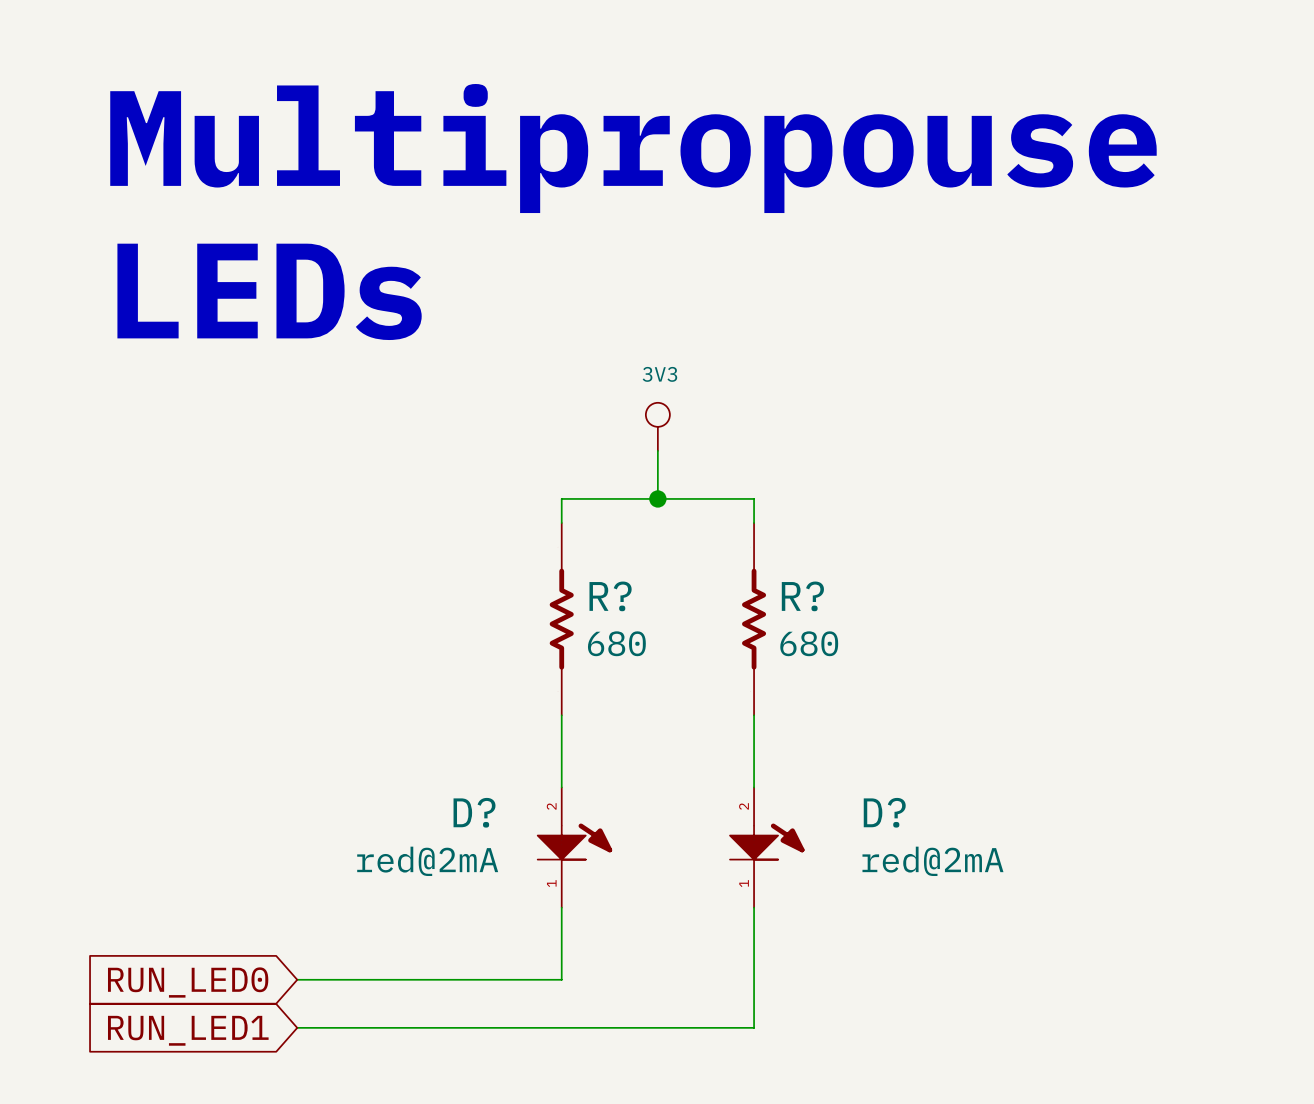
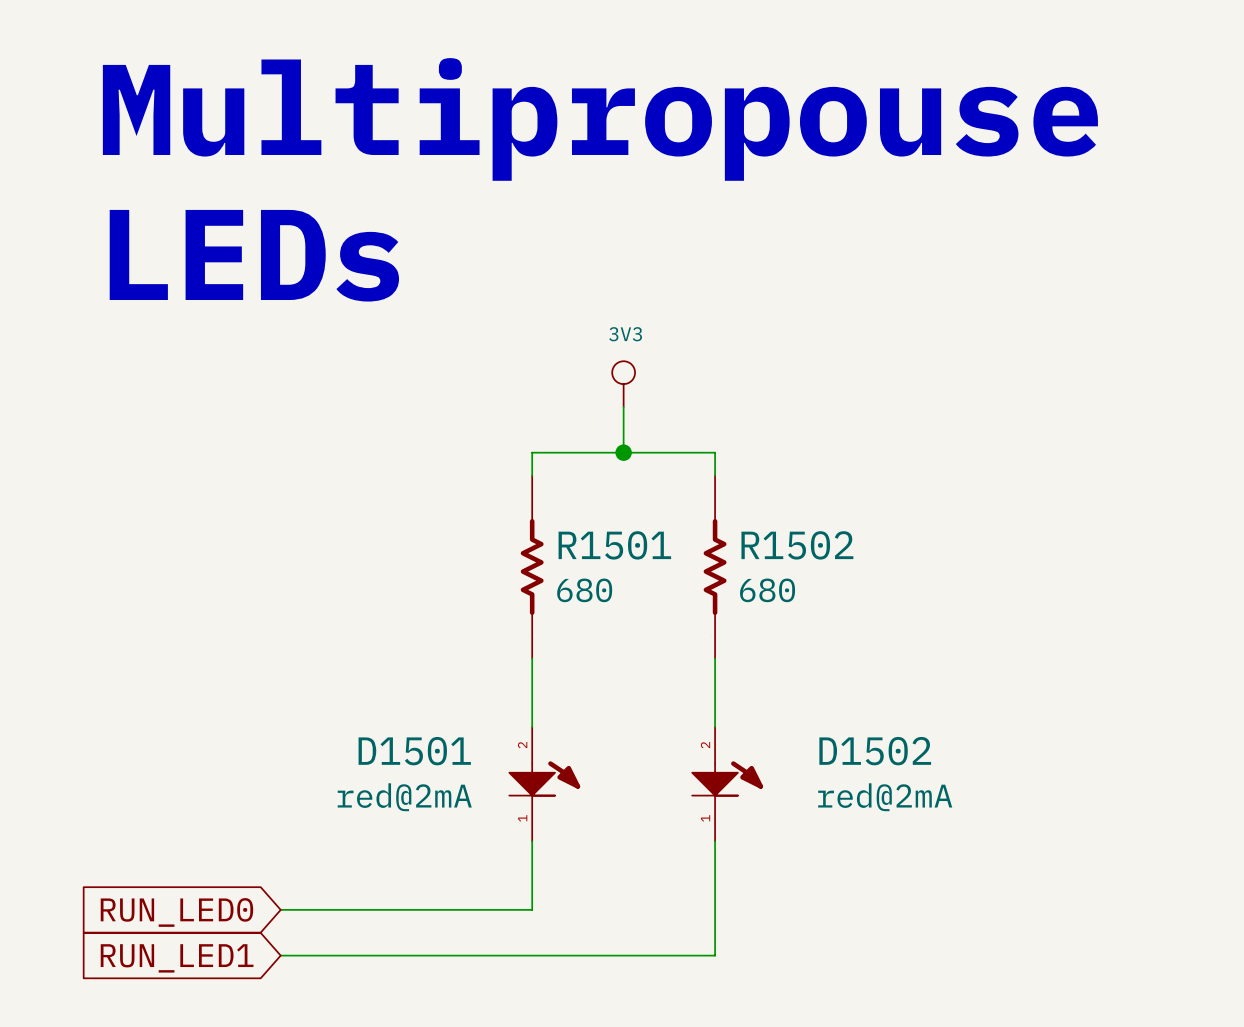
R? name: R? (610, 596) -> R1501 (614, 545)
R? name: R? (802, 596) -> R1502 (797, 545)
D? name: D? (474, 812) -> D1501 (414, 751)
D? name: D? (884, 812) -> D1502 (875, 751)

